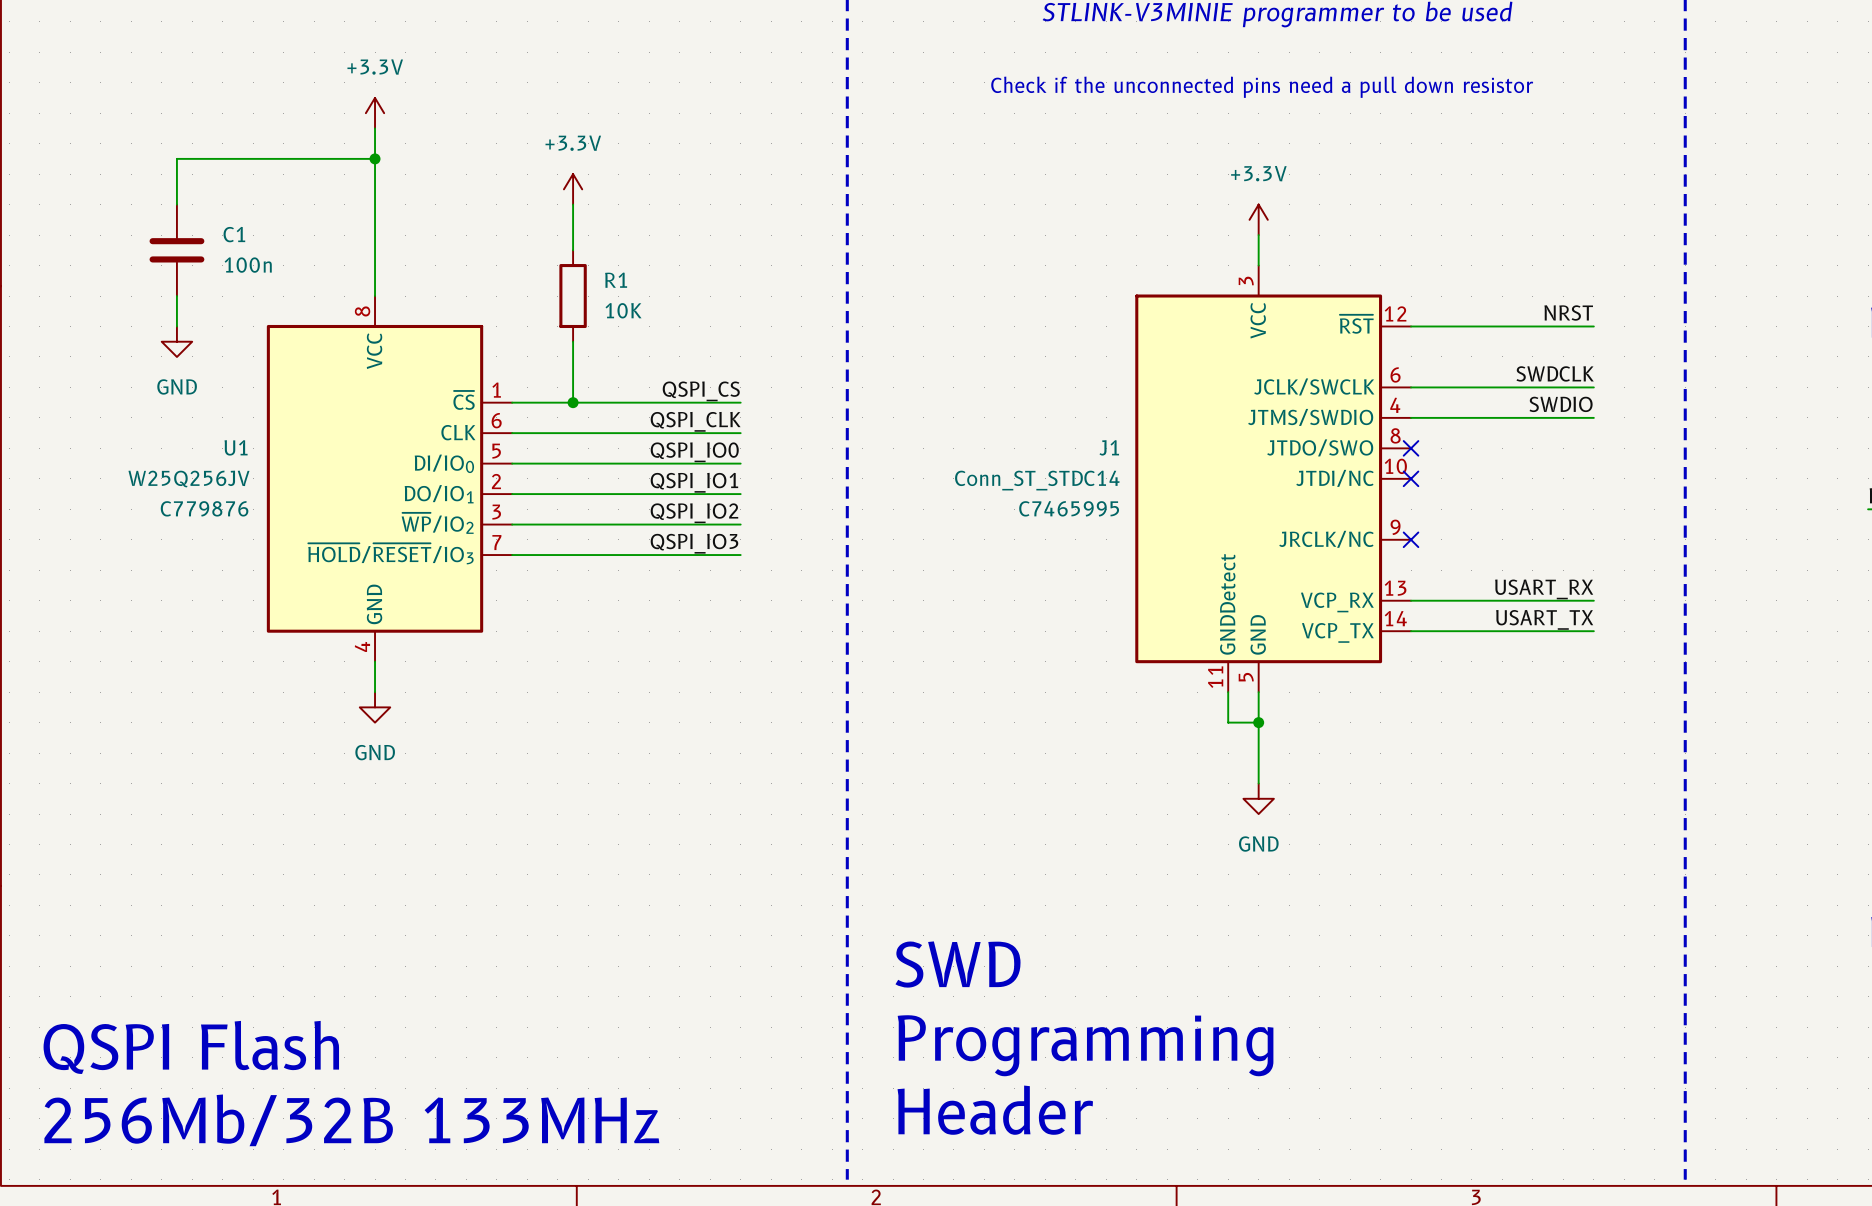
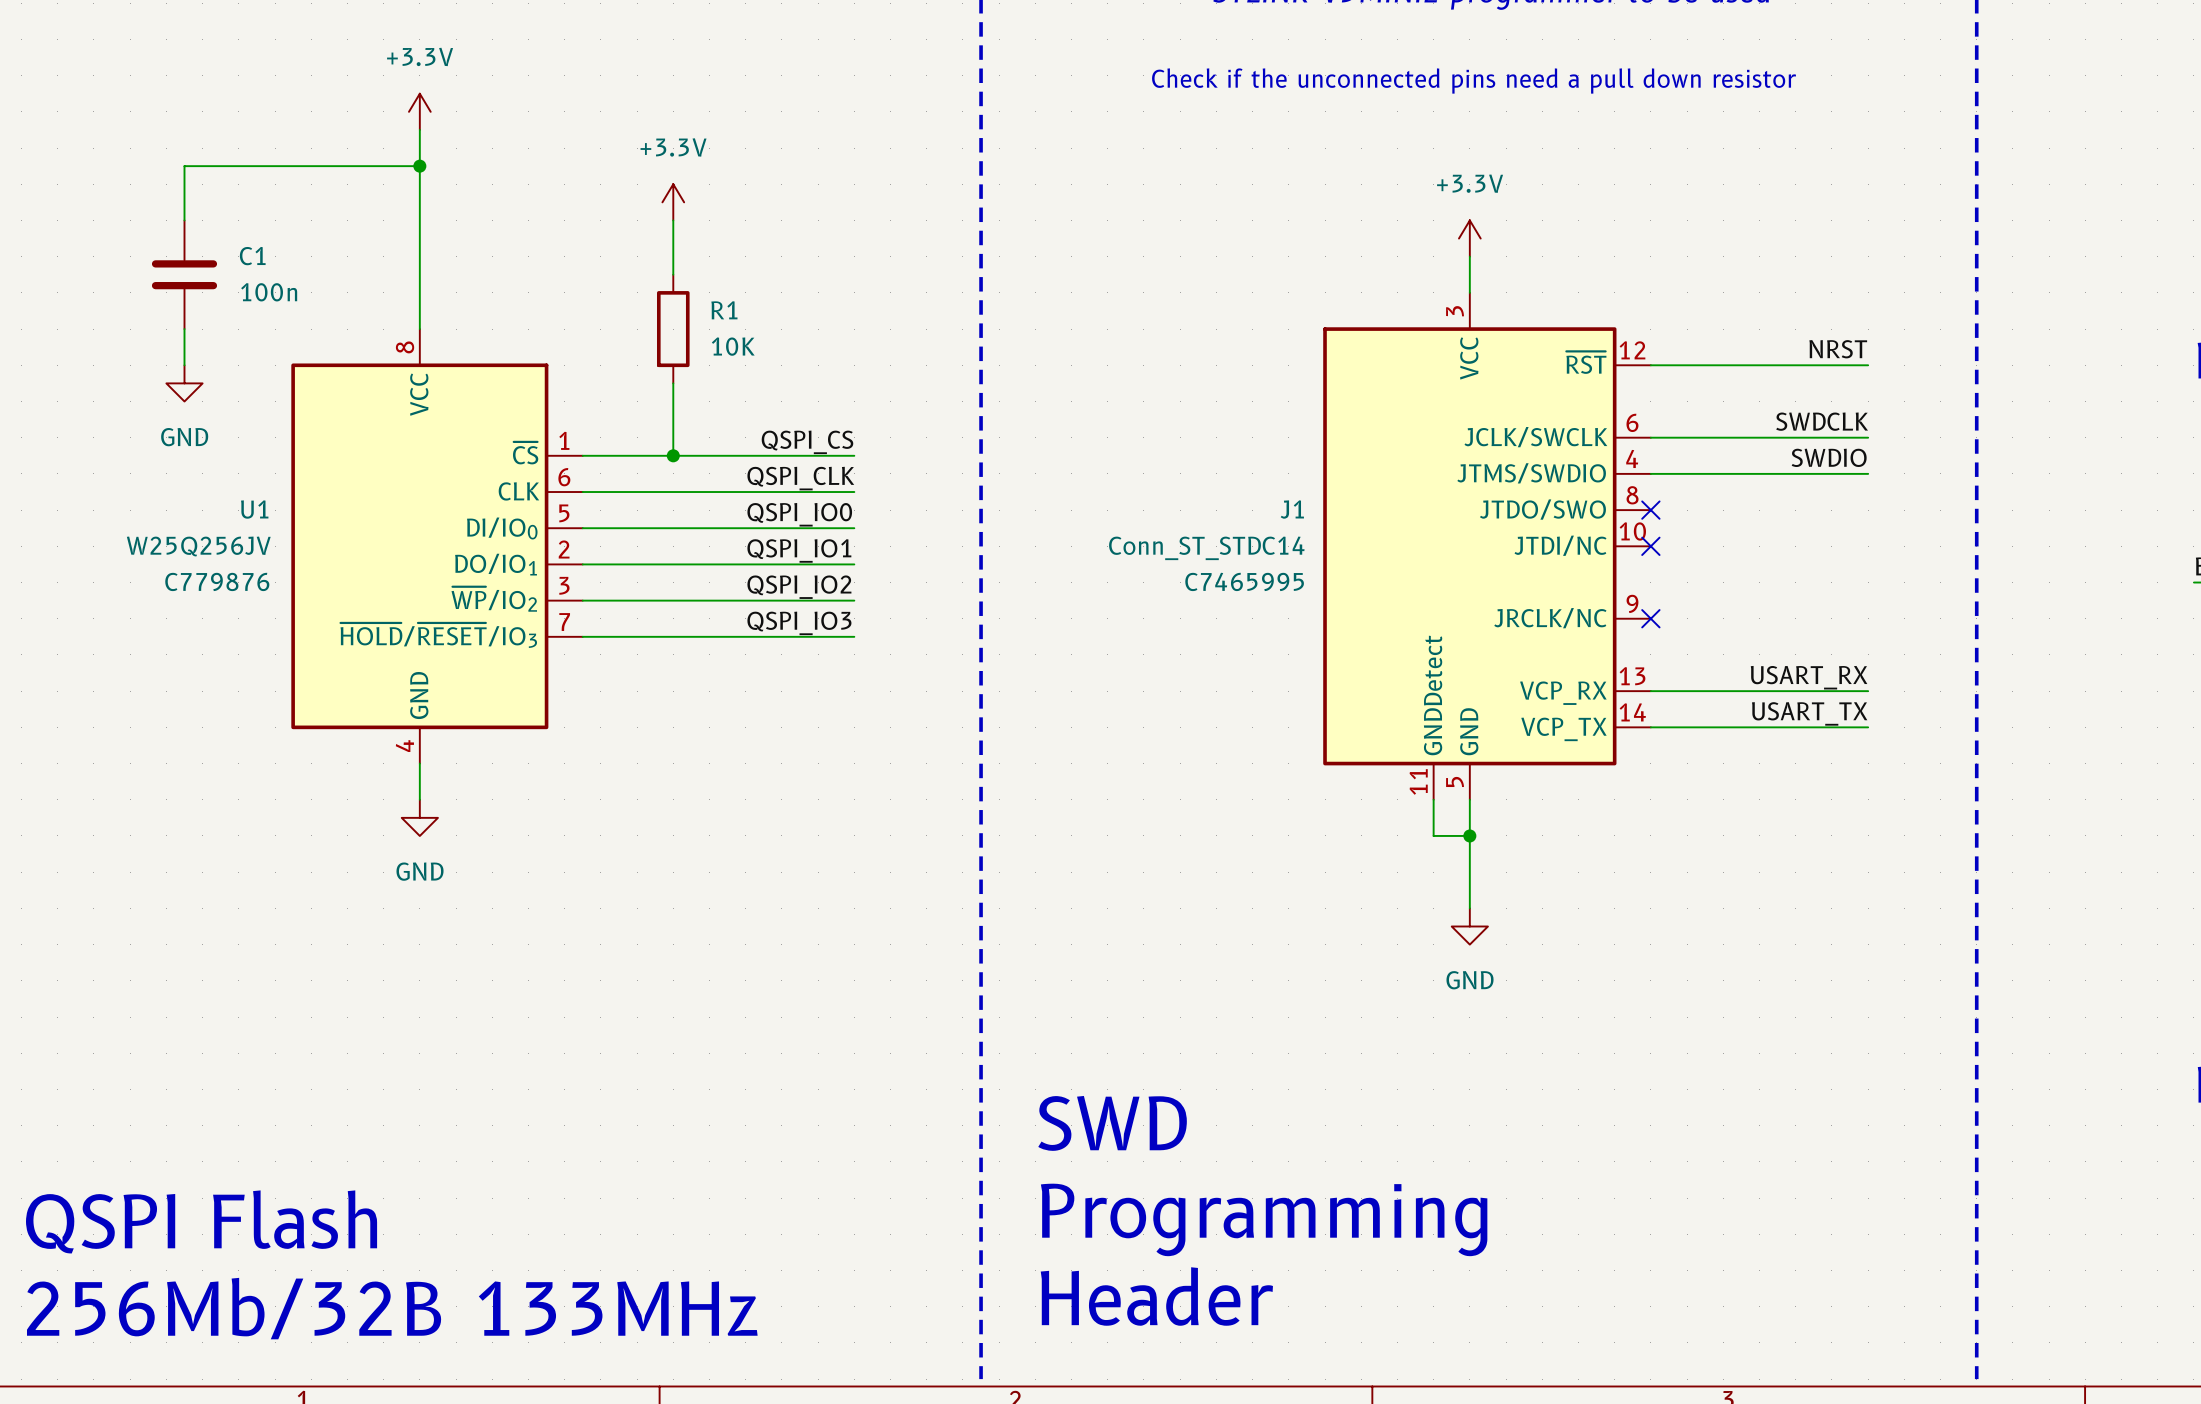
power symbol position: +3.3V (573, 189) -> +3.3V (673, 202)
wire: (573, 204) (573, 250) -> (673, 220) (673, 274)
R1 position: (573, 296) -> (673, 329)
wire: (573, 341) (573, 402) -> (673, 383) (673, 455)
junction position: (573, 402) -> (673, 455)

